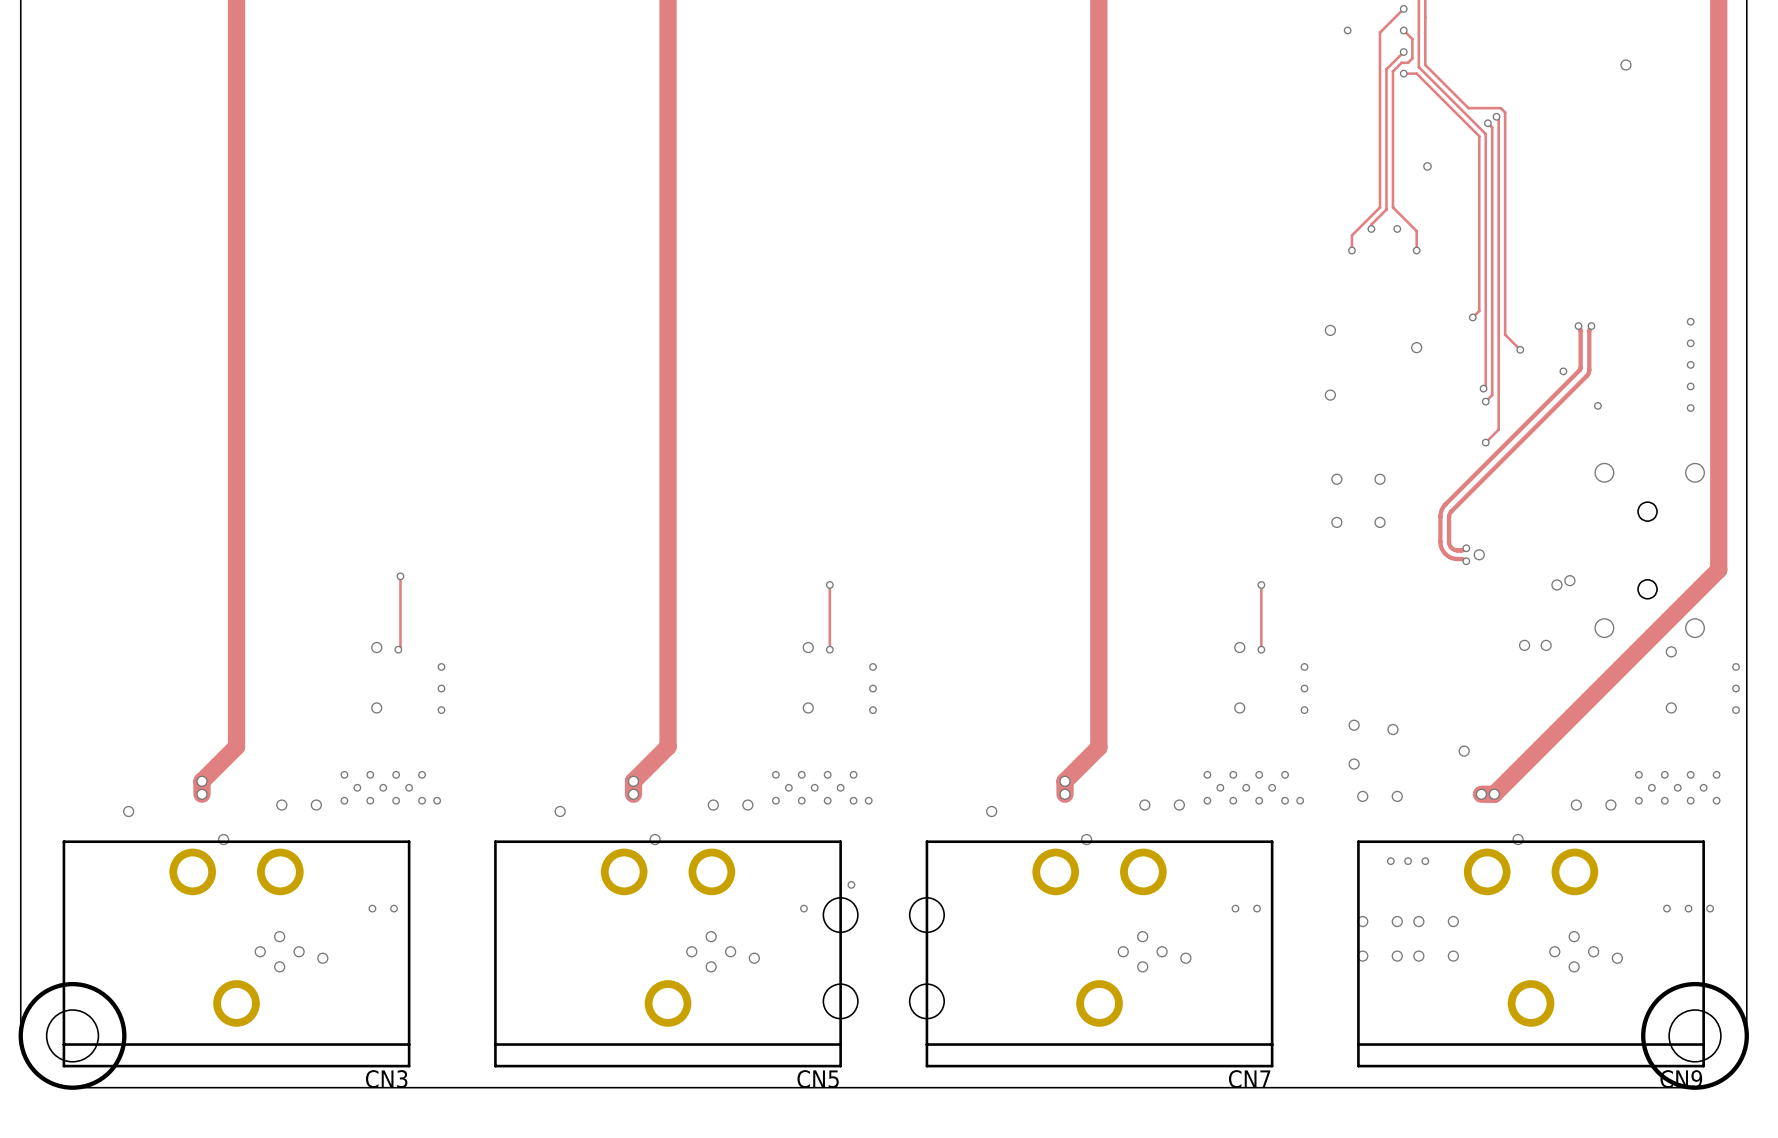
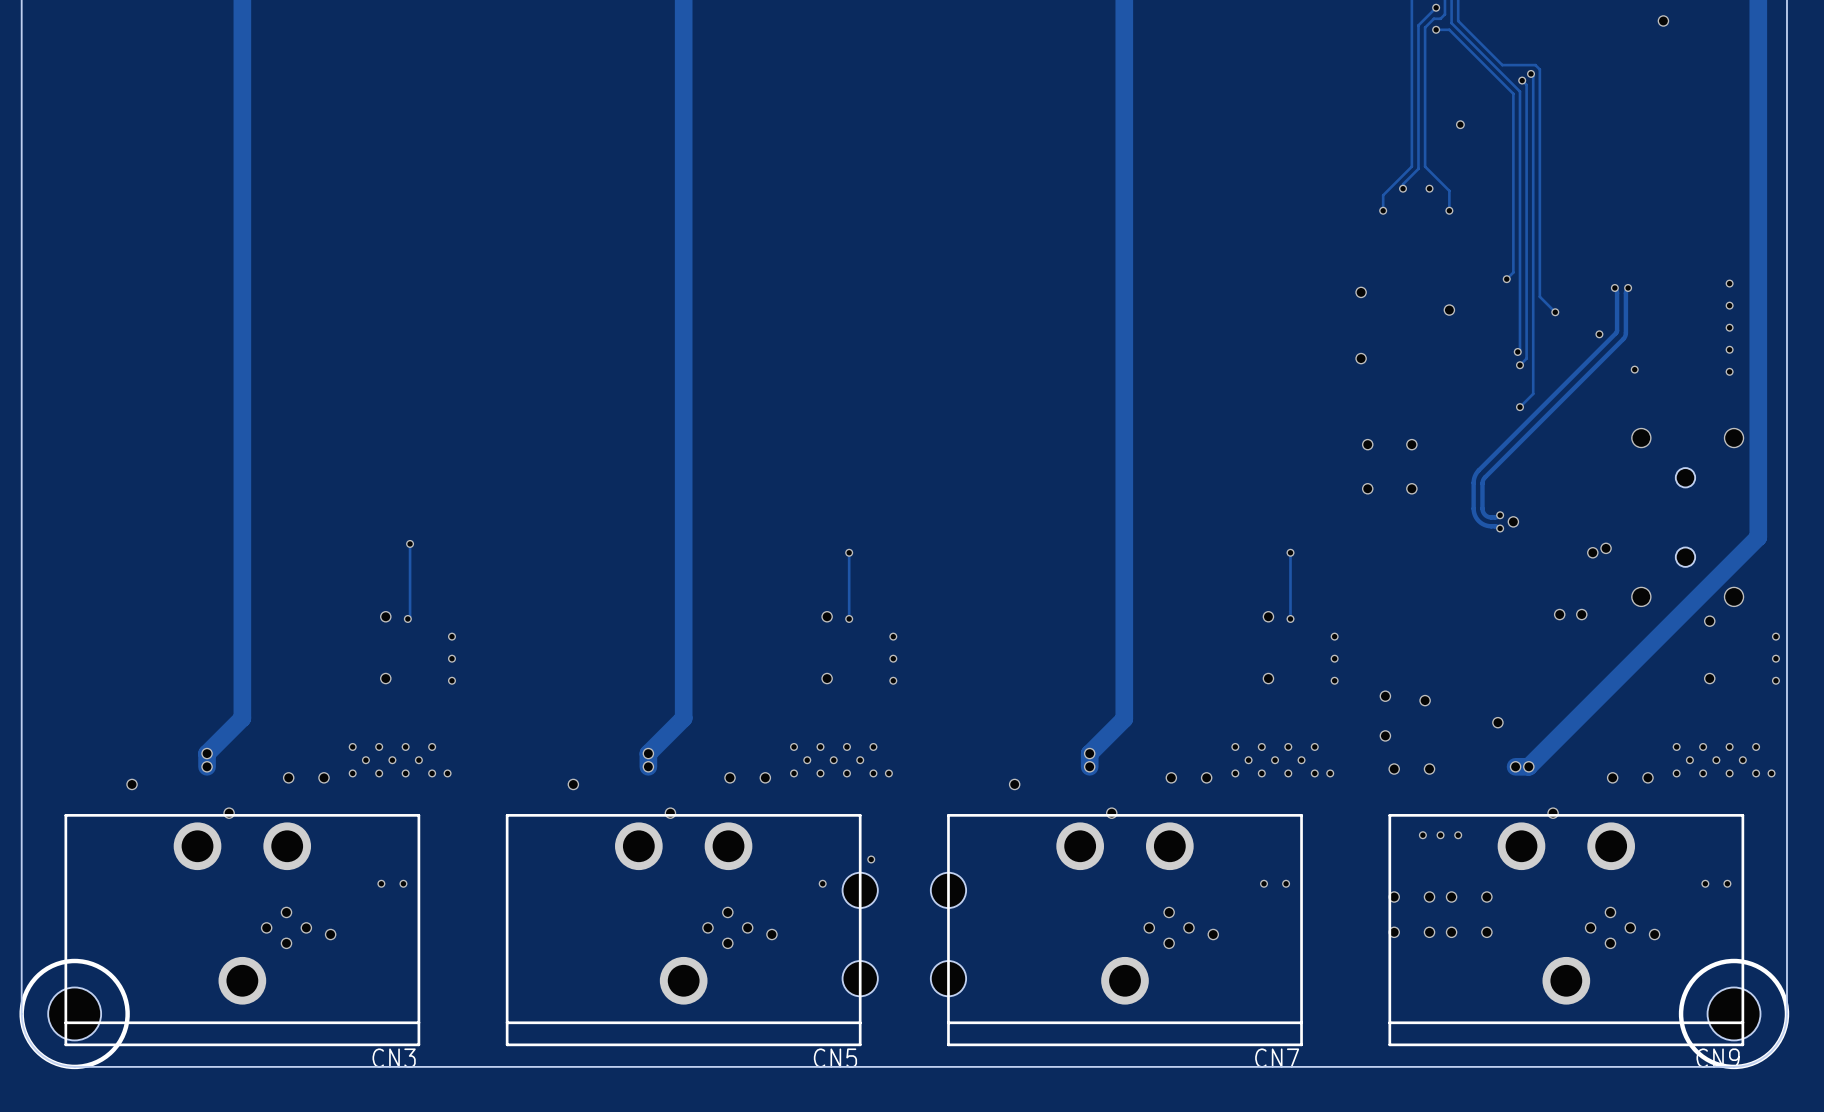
via: none -> (1771, 773)
via: (1710, 908) -> none

